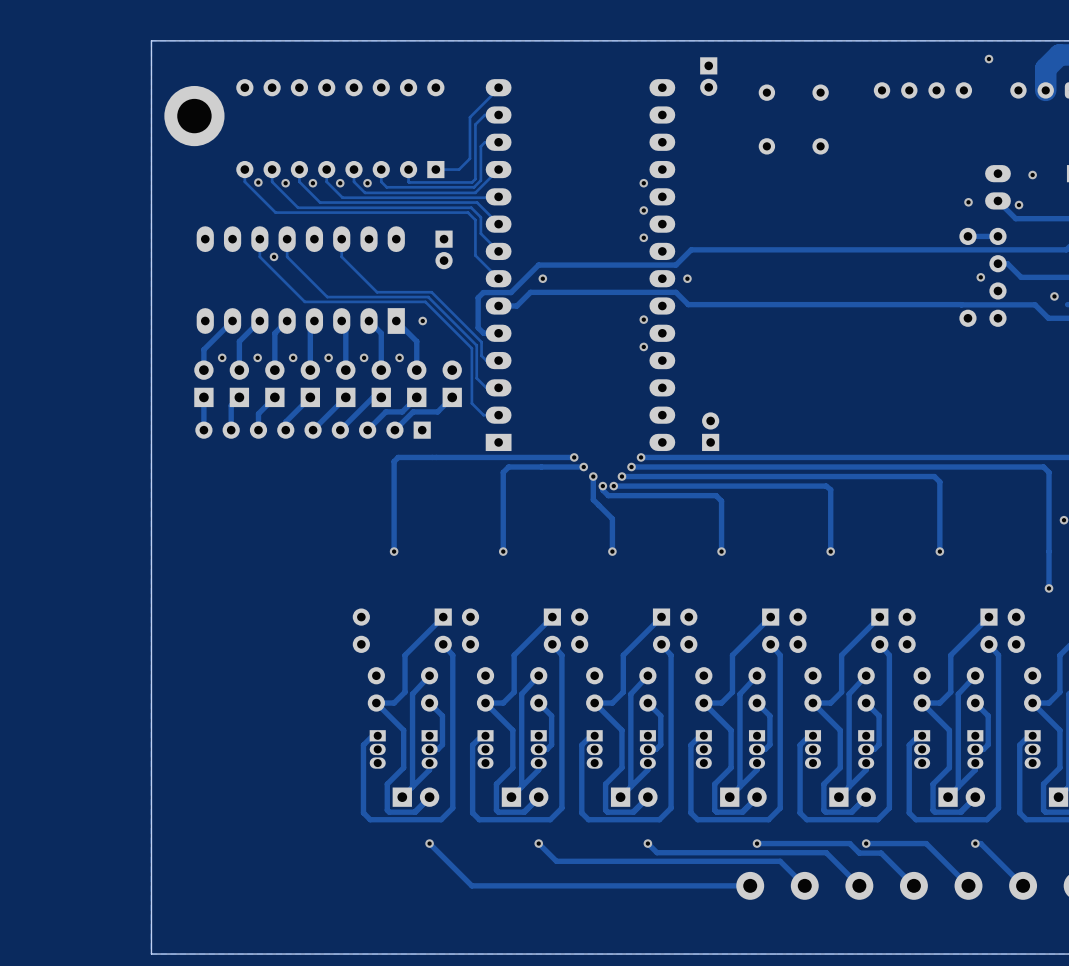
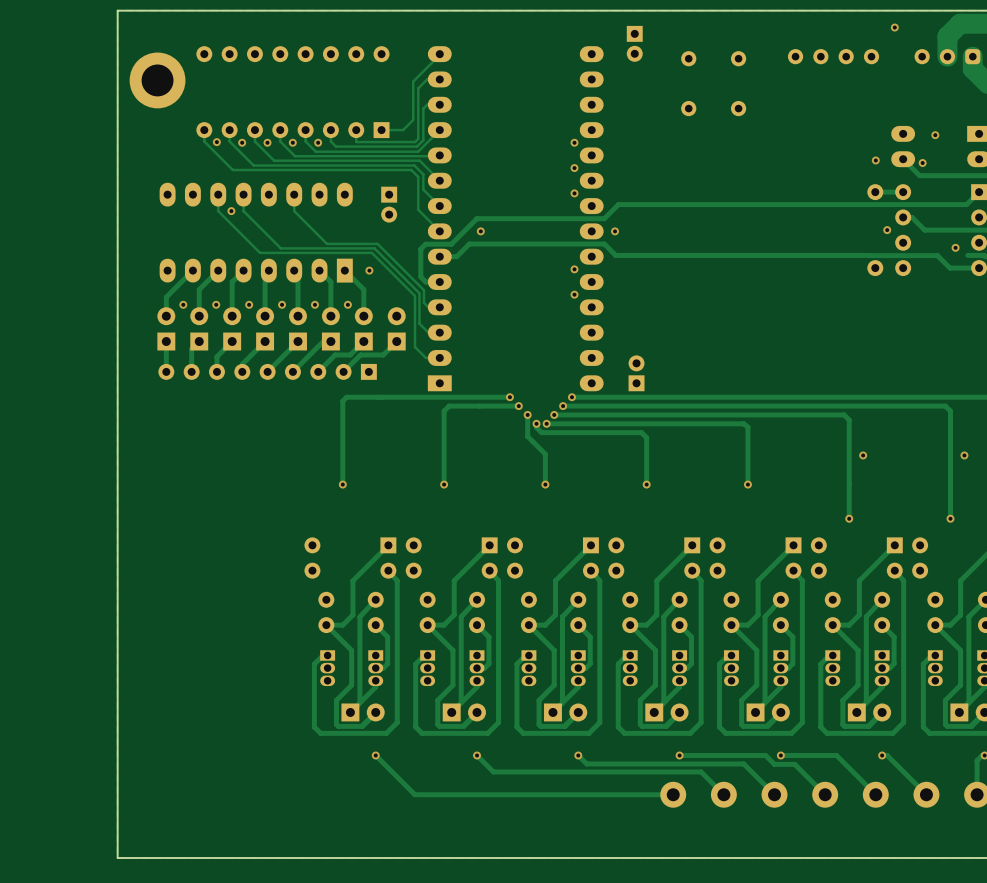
via: none -> (863, 455)
track: none -> (849, 484) (849, 518)
via: (939, 551) -> none
via: none -> (849, 518)

